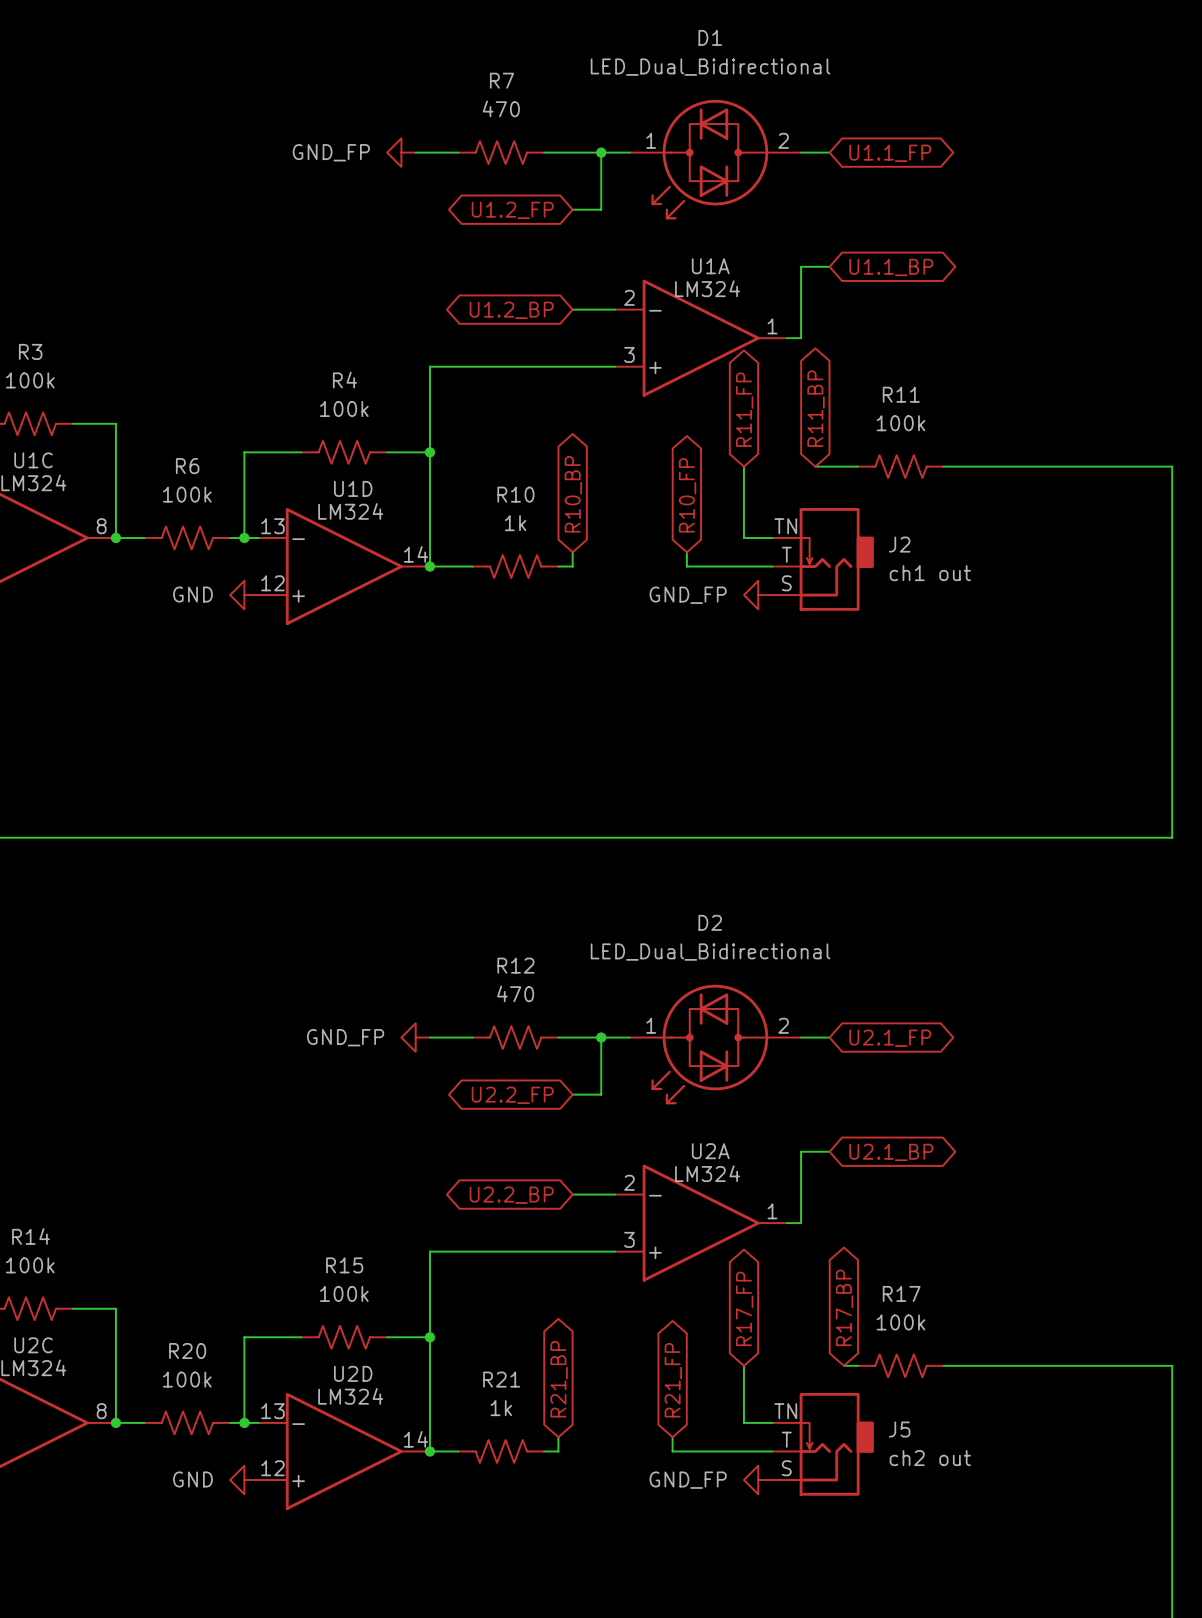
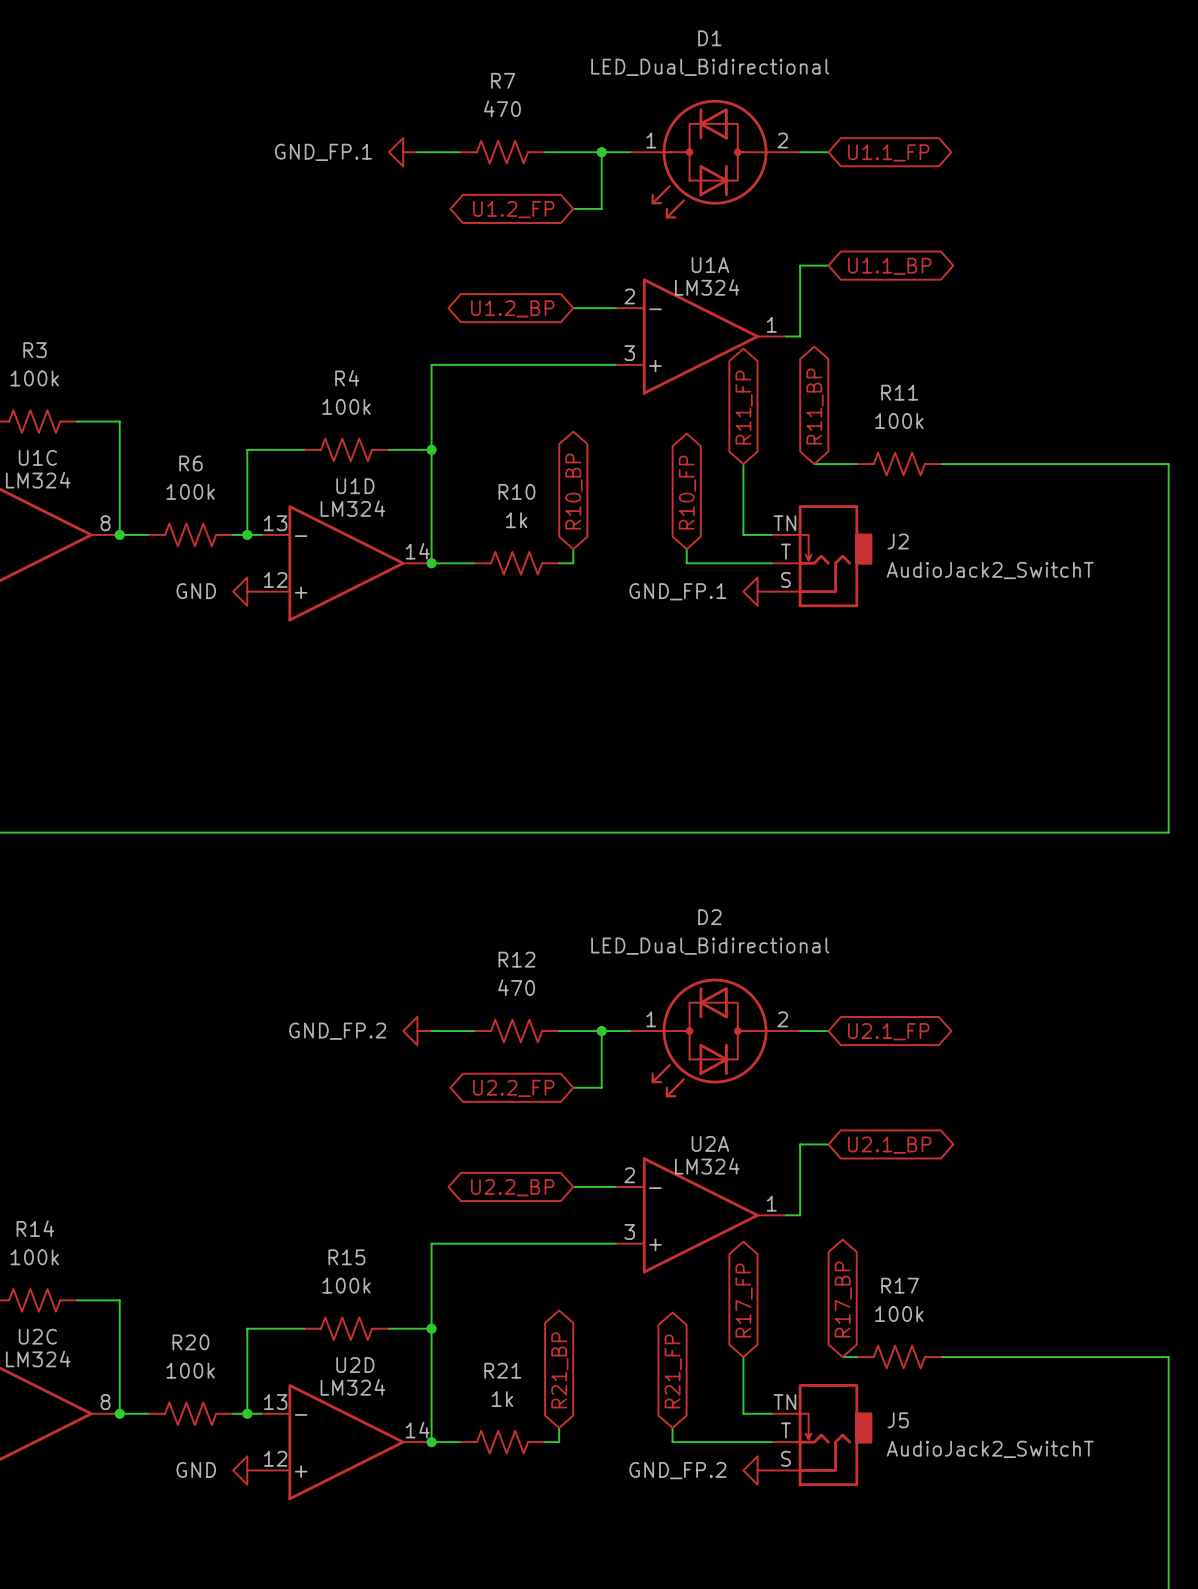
power symbol: GND_FP (401, 152) -> GND_FP.1 (403, 152)
R10 flip: as is (515, 566) -> left-right (516, 563)
J2 value: ch1 out (930, 573) -> AudioJack2_SwitchT (990, 570)
power symbol: GND_FP (758, 595) -> GND_FP.1 (757, 591)
power symbol: GND_FP (415, 1037) -> GND_FP.2 (417, 1031)
R21 flip: as is (501, 1451) -> left-right (502, 1442)
J5 value: ch2 out (930, 1458) -> AudioJack2_SwitchT (990, 1449)
power symbol: GND_FP (758, 1480) -> GND_FP.2 (757, 1470)

